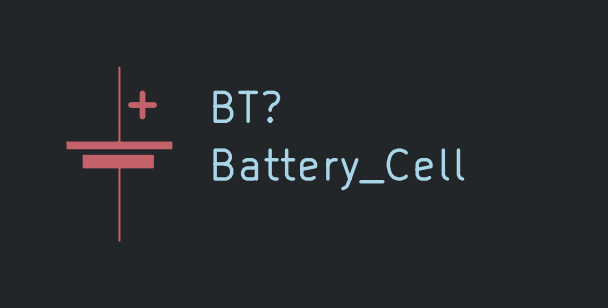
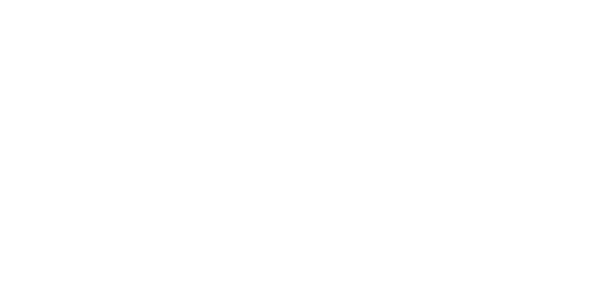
BT?: Battery_Cell (119, 154) -> none

